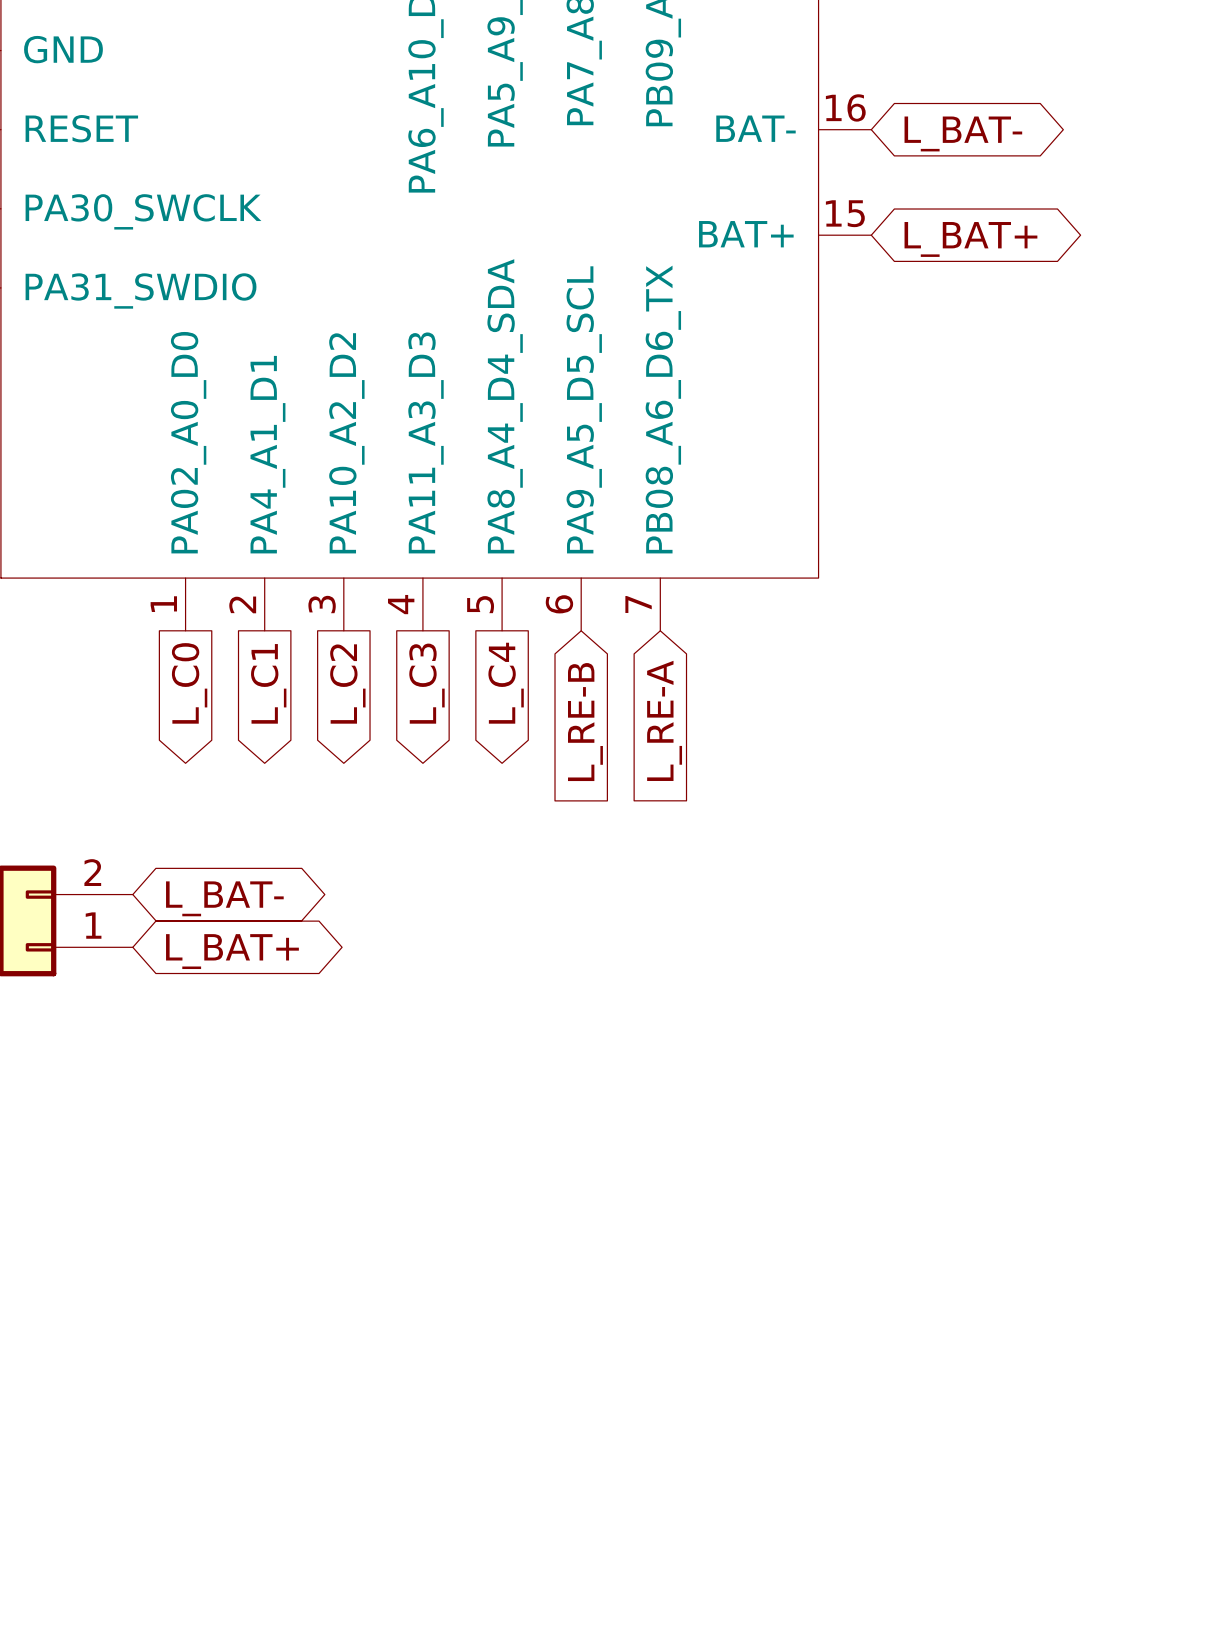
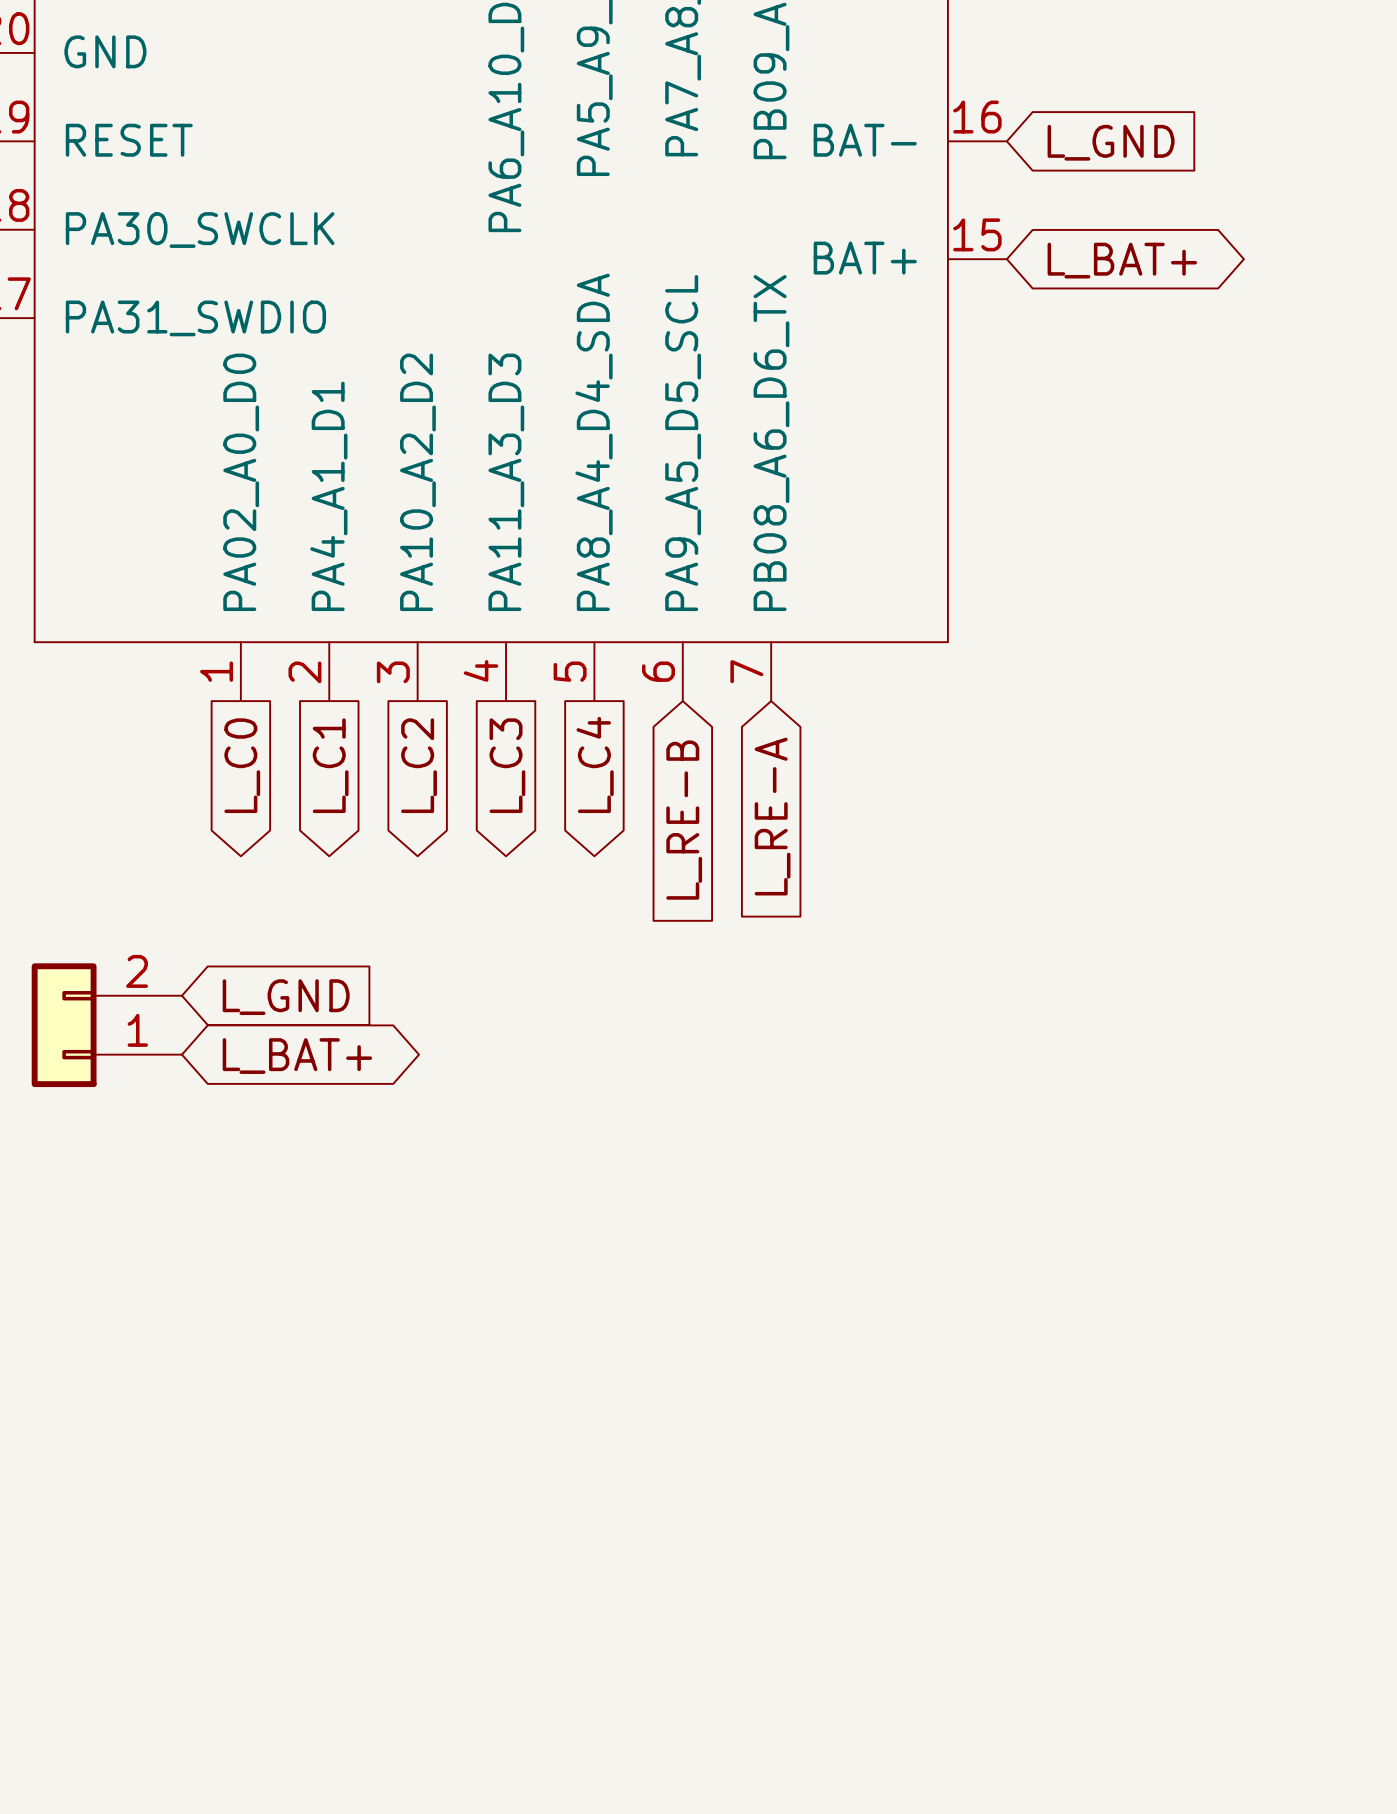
global label shape: bidirectional (963, 133) -> input (1111, 142)
global label: L_BAT- (963, 133) -> L_GND (1111, 142)
global label shape: bidirectional (224, 898) -> input (286, 997)
global label: L_BAT- (224, 898) -> L_GND (286, 997)

